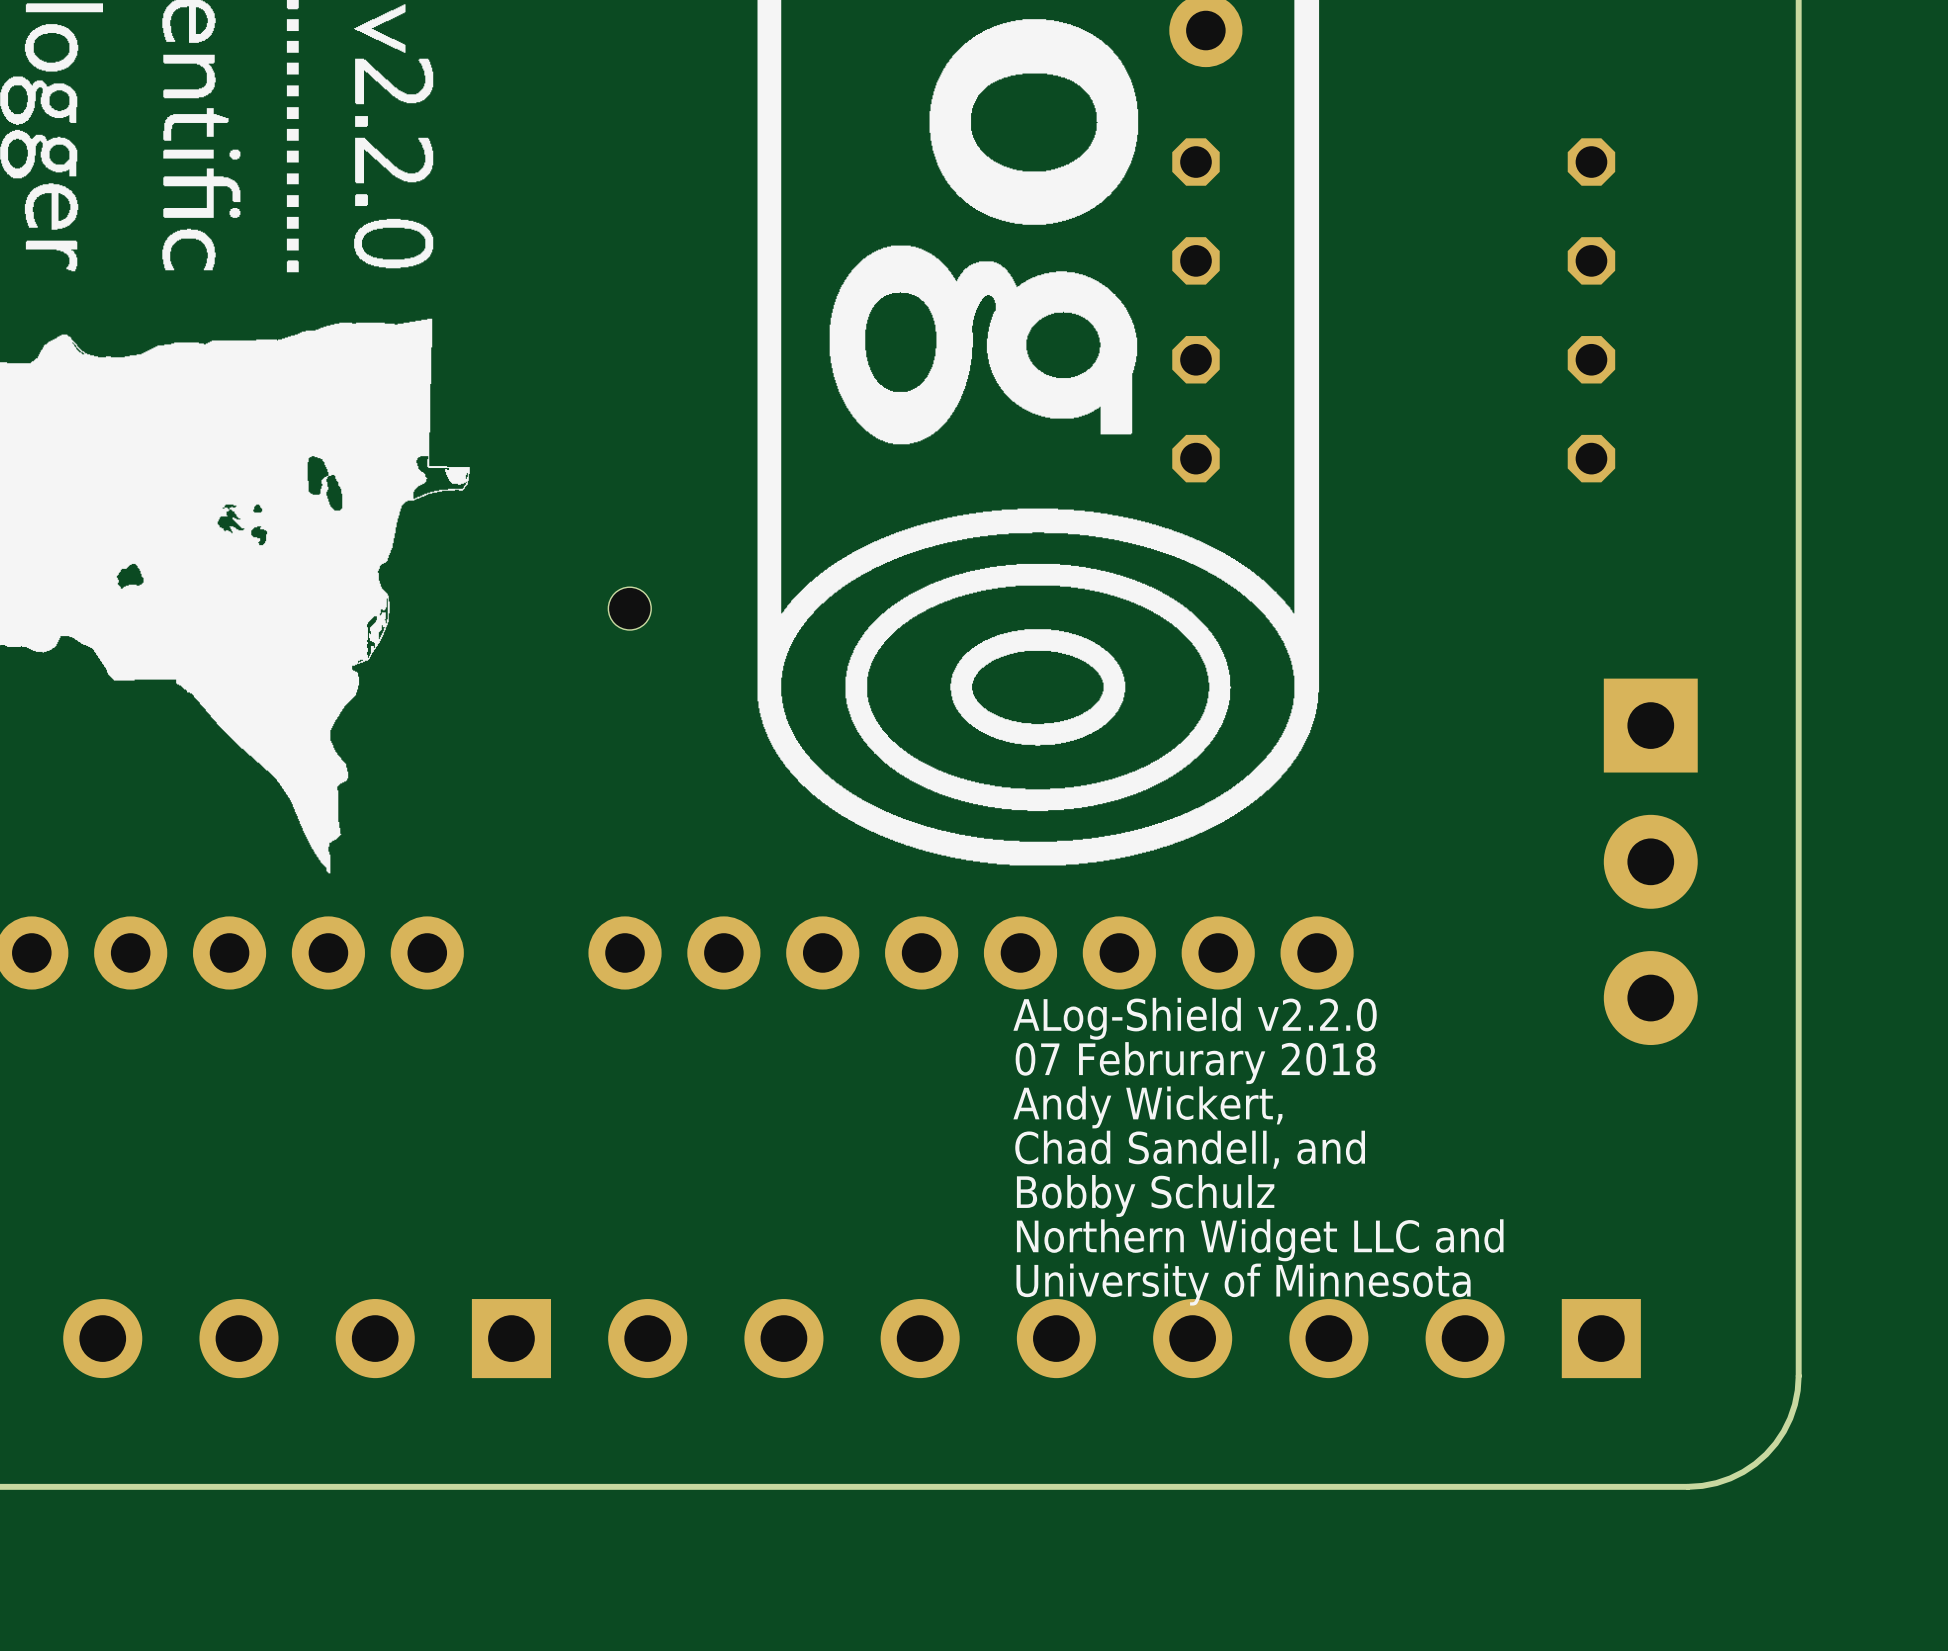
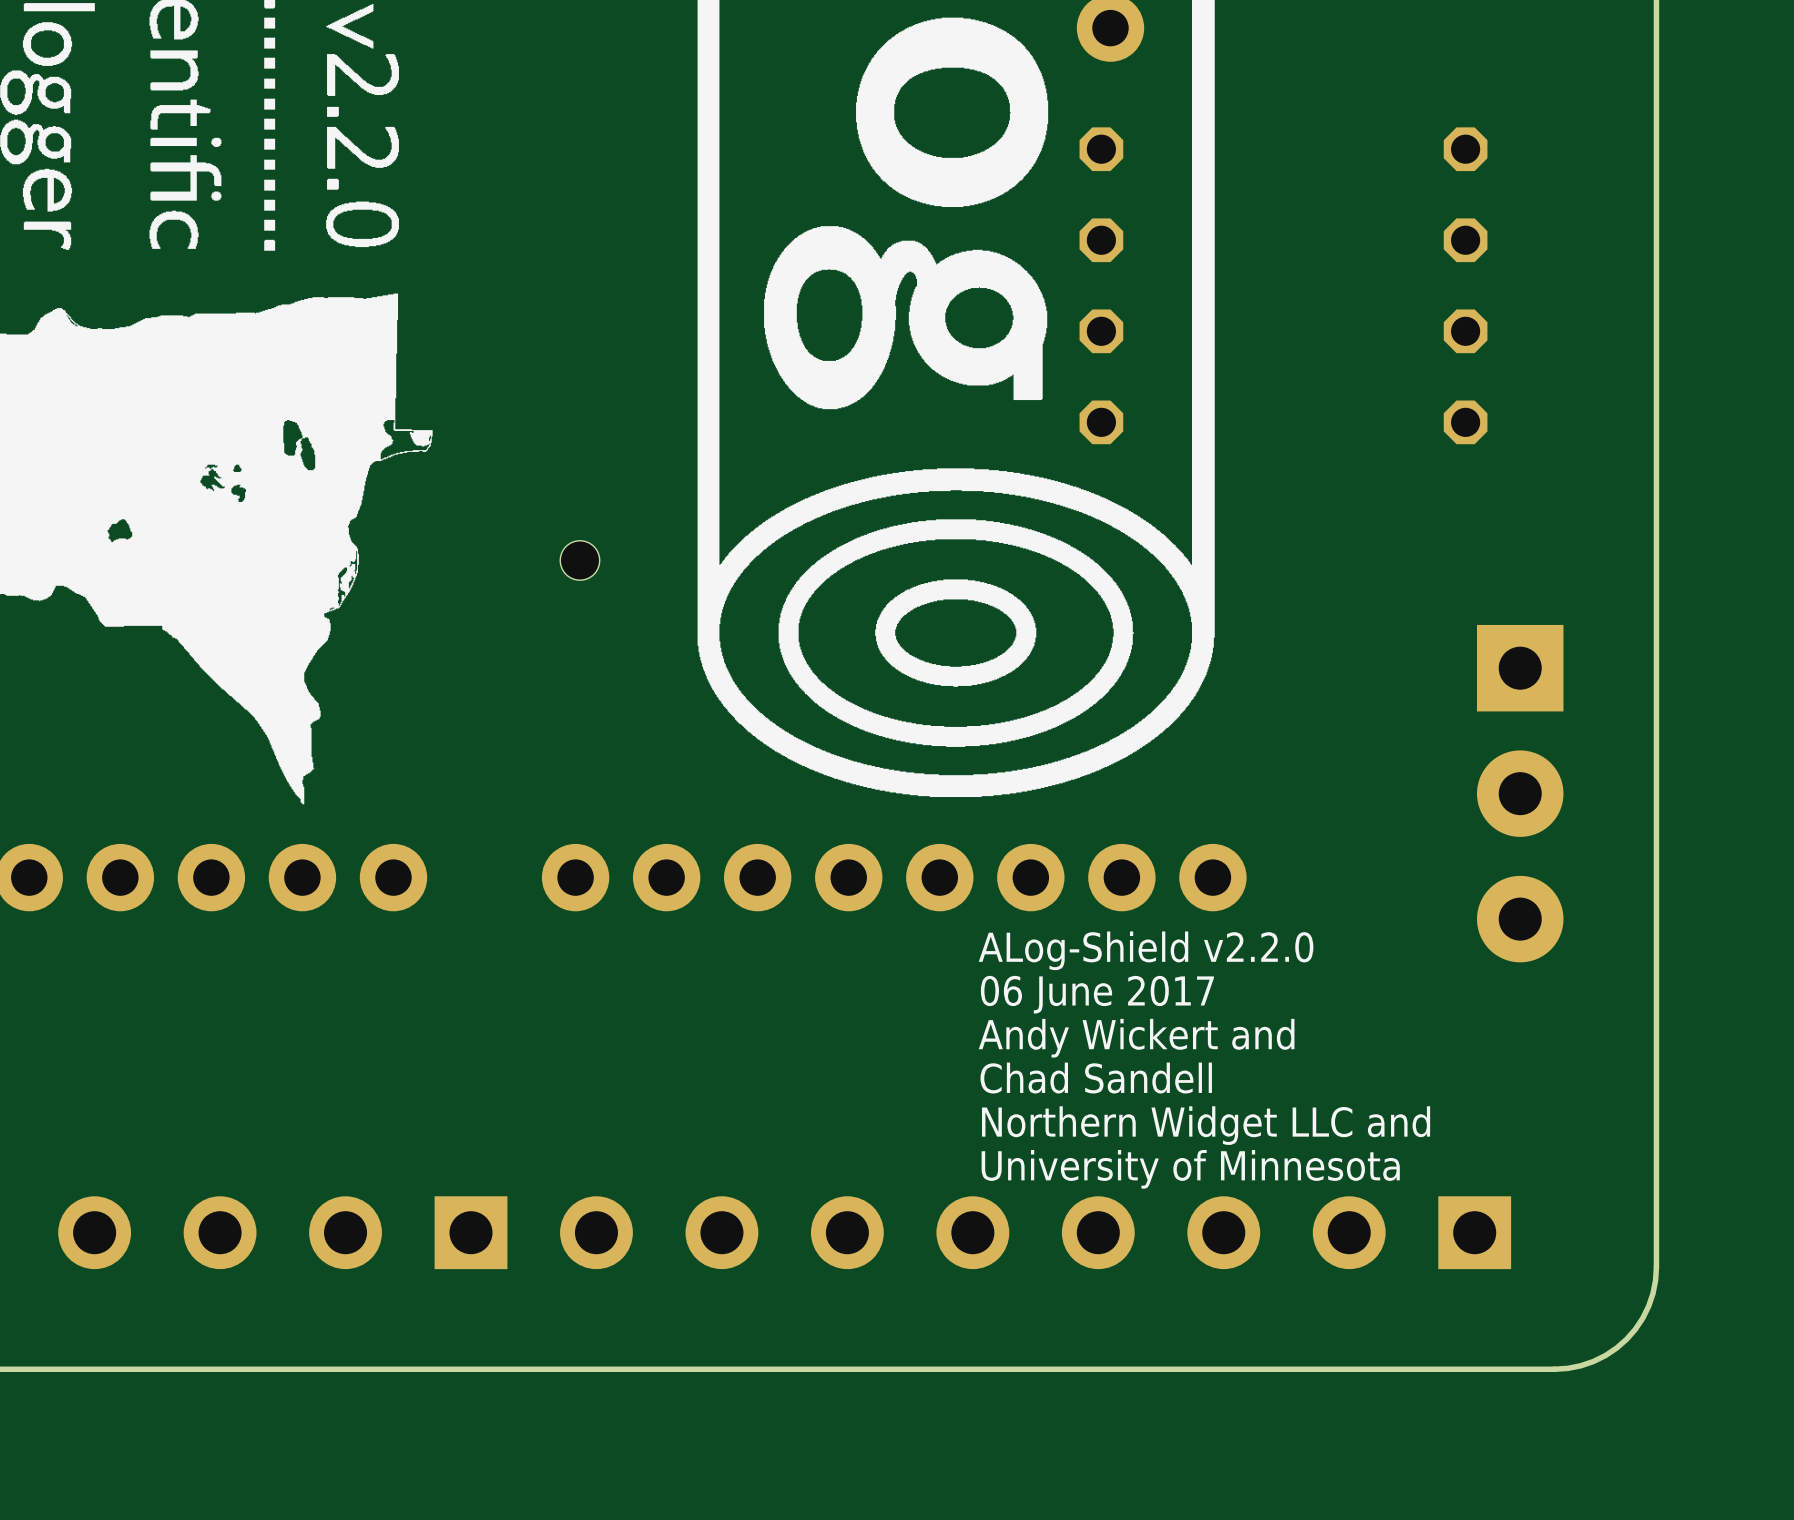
text position: ALog-Shield v2.2.0 (1195, 1018) -> ALog-Shield v2.2.0 (1146, 950)
text: 07 Februrary 2018 (1195, 1063) -> none
text: none -> 06 June 2017 (1097, 994)
text: Andy Wickert, (1147, 1107) -> Andy Wickert and (1136, 1038)
text: Chad Sandell, and (1190, 1149) -> Chad Sandell (1096, 1078)
text: Bobby Schulz (1145, 1195) -> none
text position: Northern Widget LLC and (1260, 1240) -> Northern Widget LLC and (1206, 1125)
text position: University of Minnesota (1243, 1284) -> University of Minnesota (1190, 1169)

